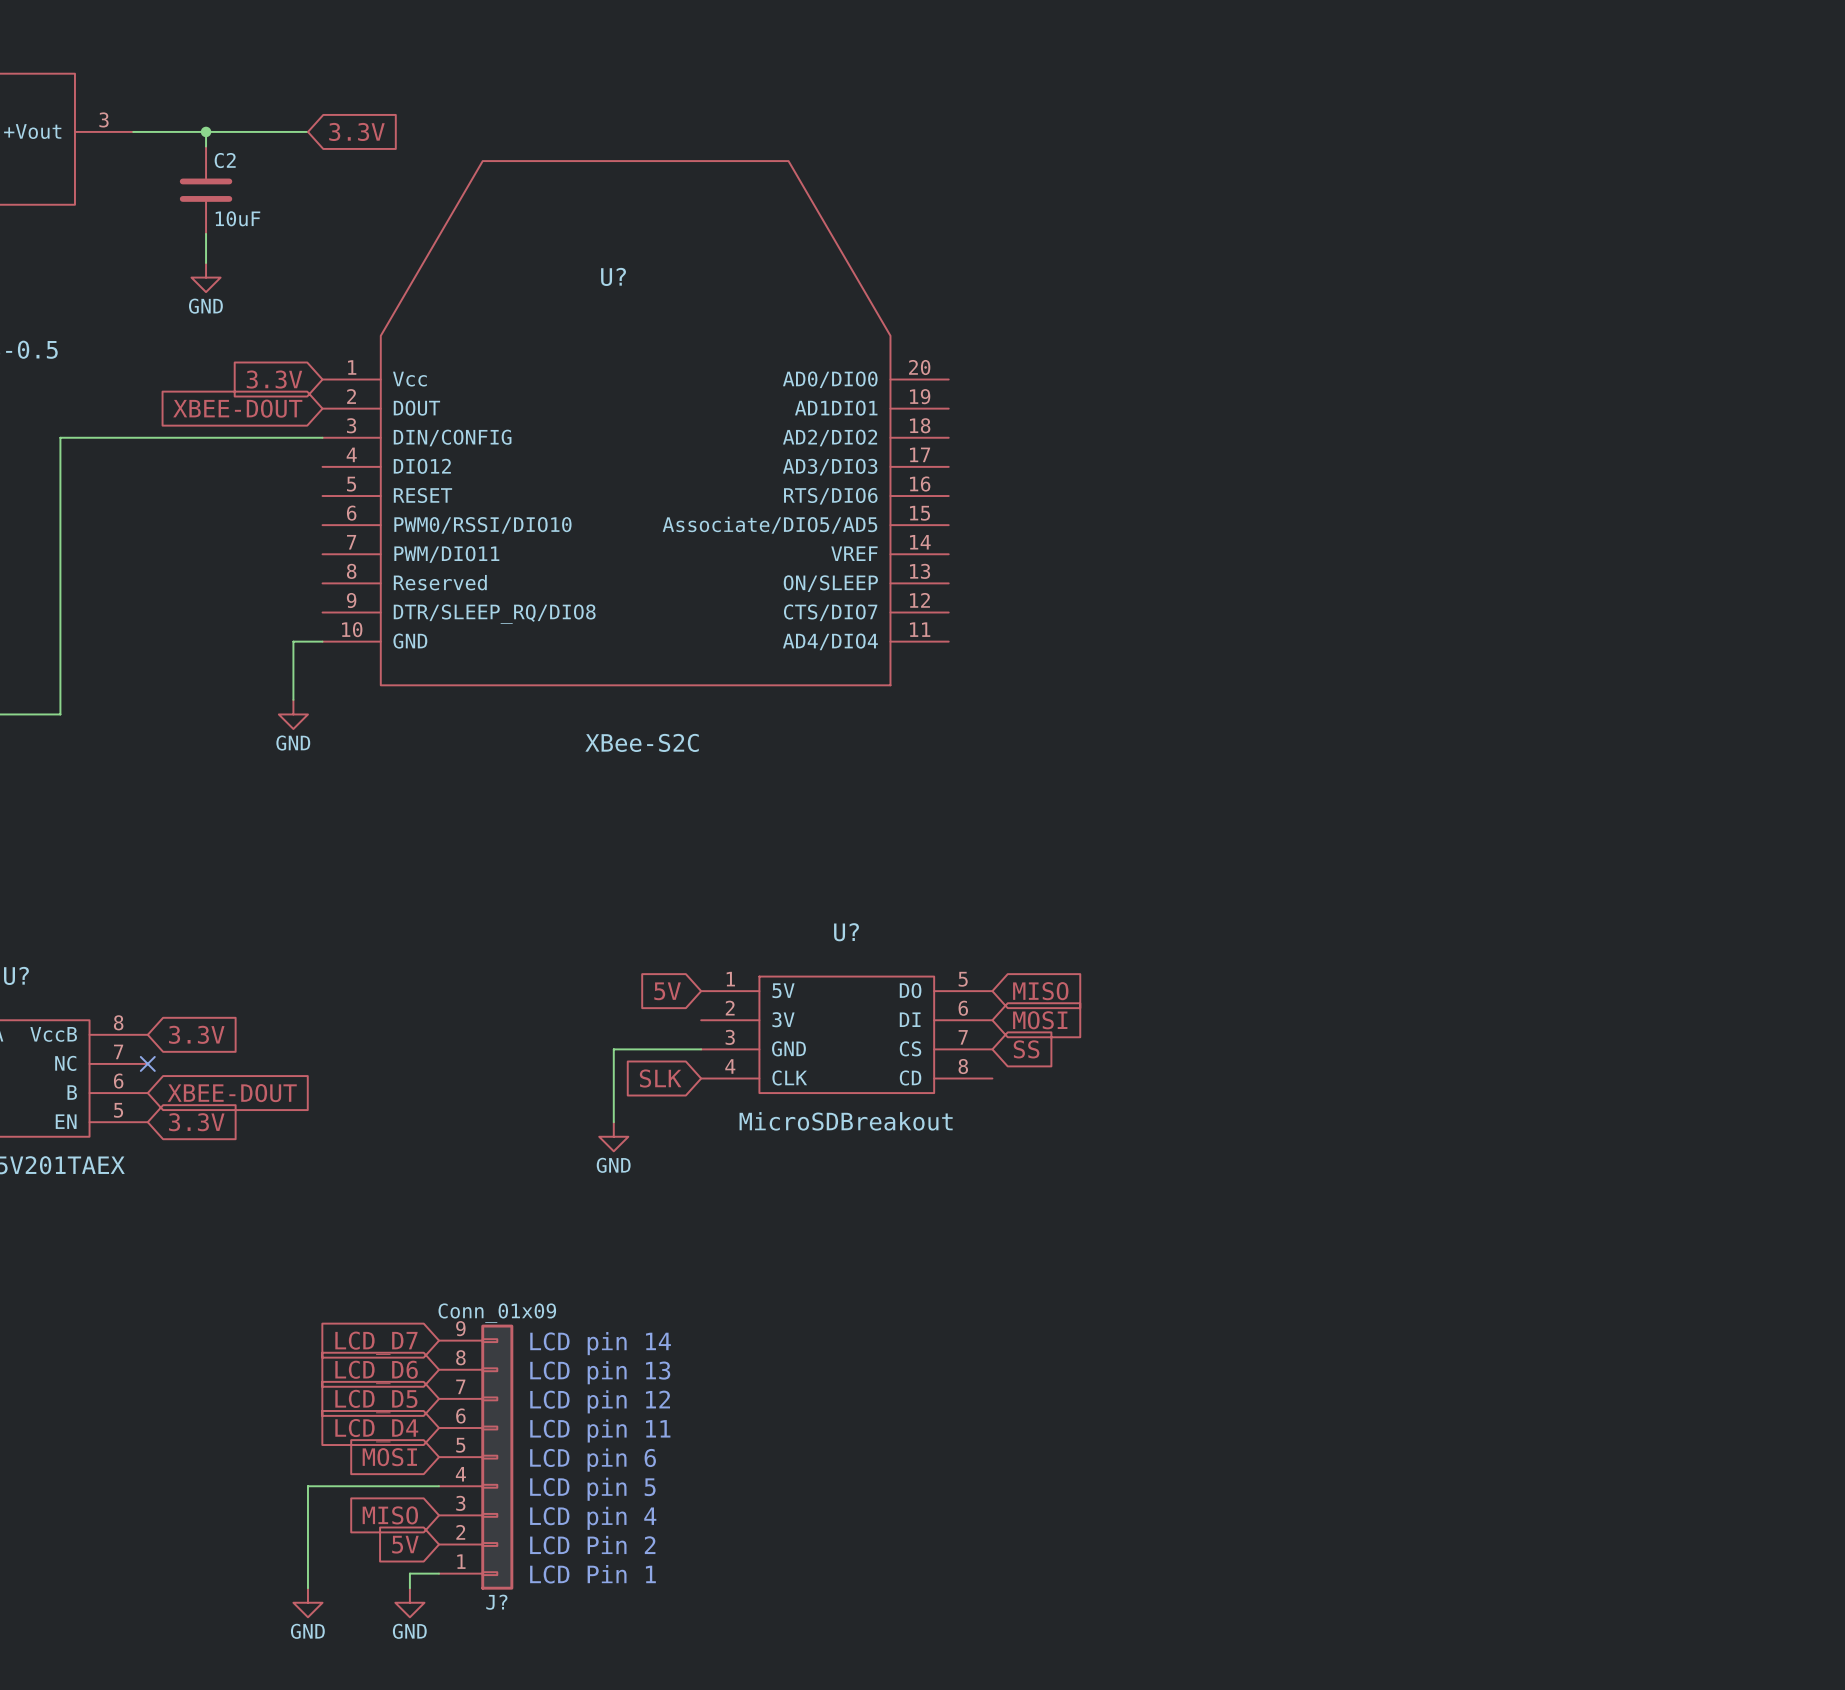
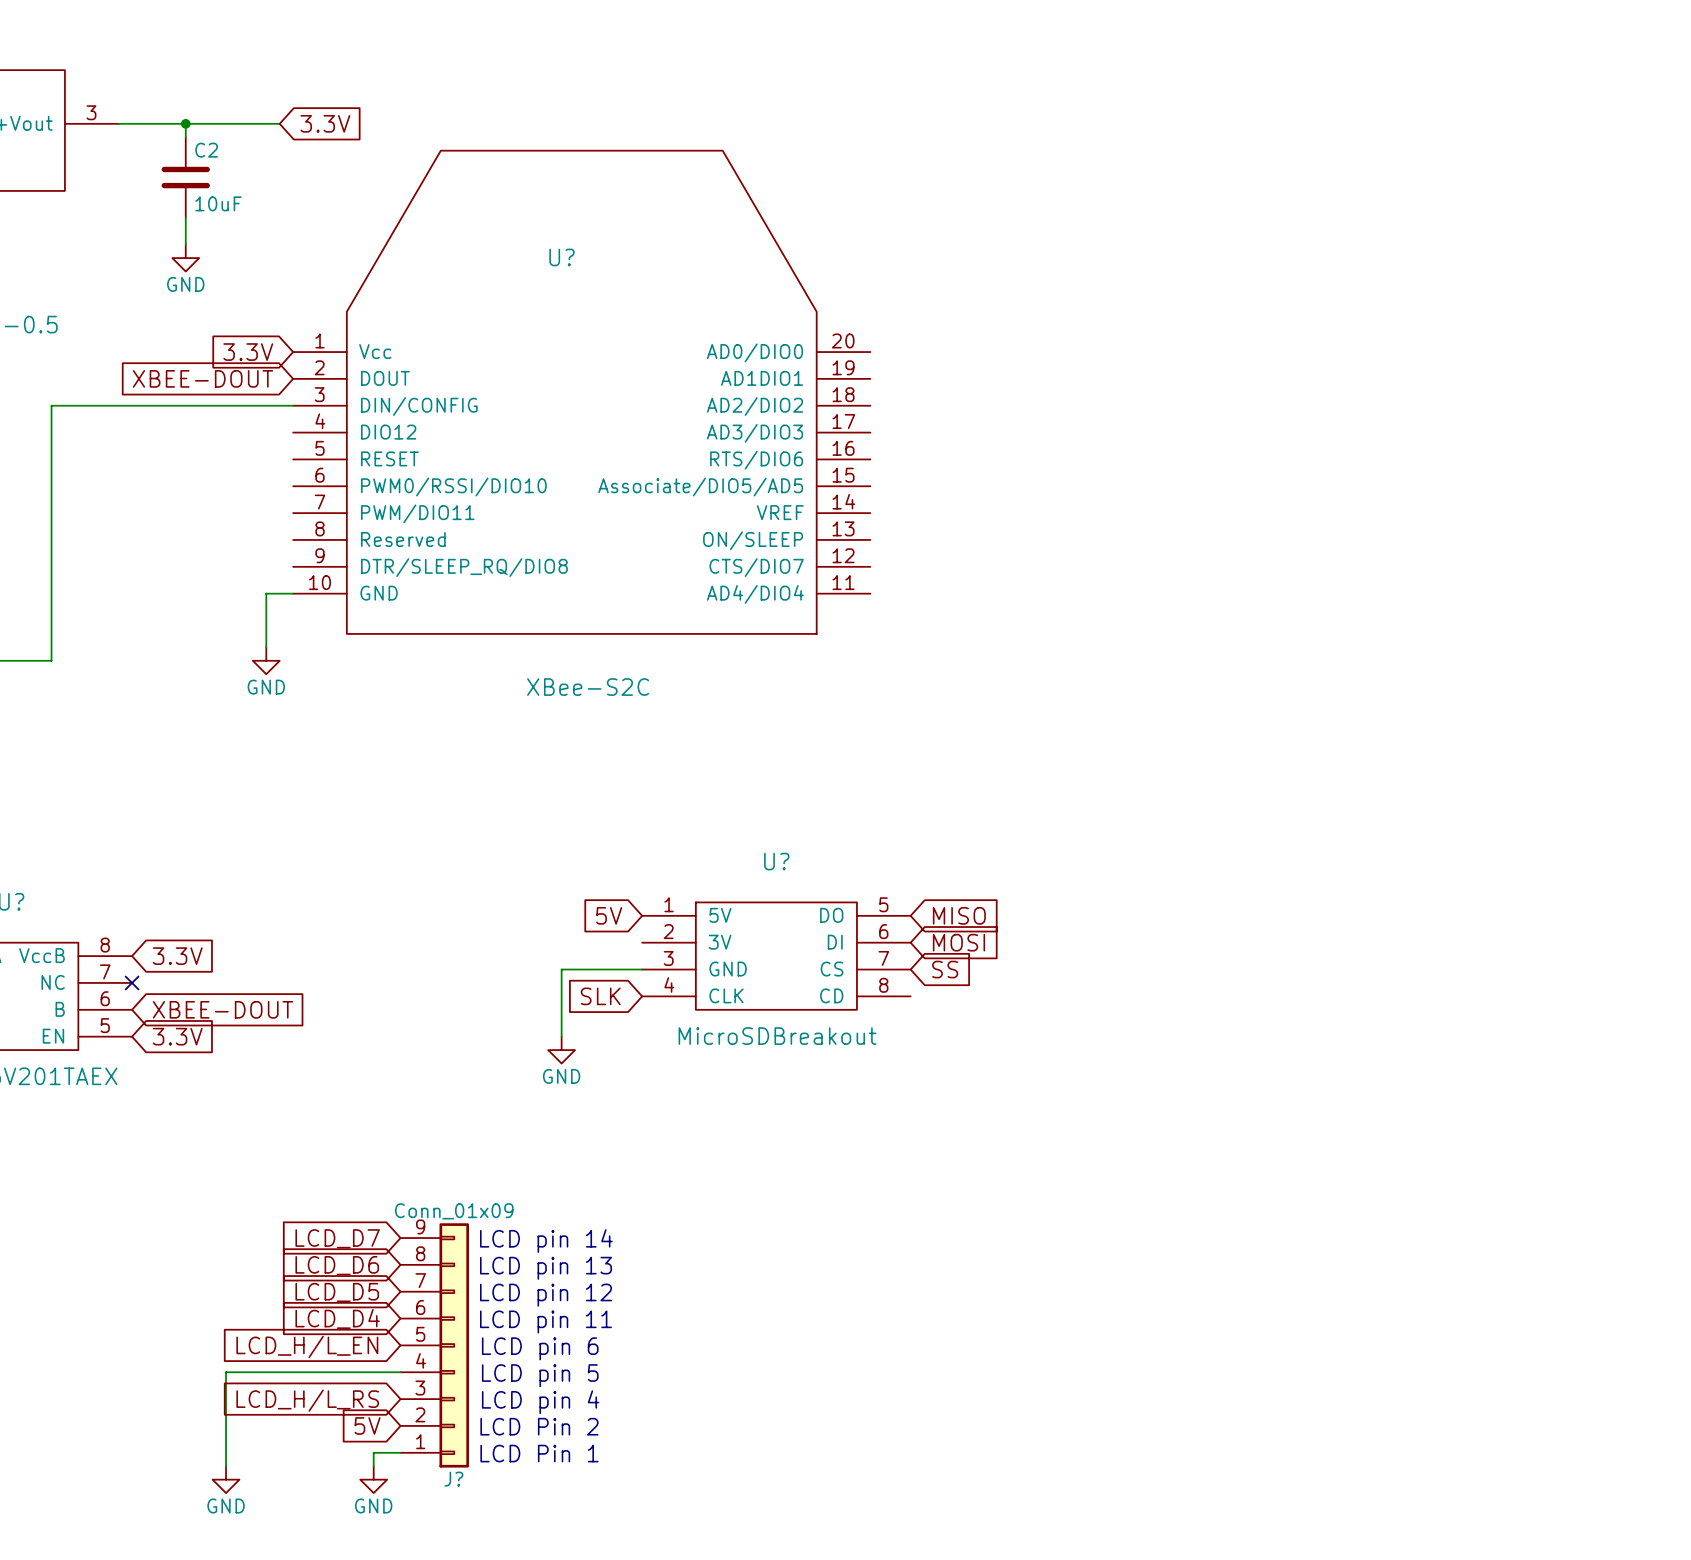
global label: MOSI (389, 1457) -> LCD_H/L_EN (307, 1346)
wire: (307, 1486) (307, 1588) -> (279, 1372) (226, 1372) (226, 1466)
global label: MISO (390, 1515) -> LCD_H/L_RS (307, 1400)
power symbol position: GND (307, 1602) -> GND (226, 1479)

